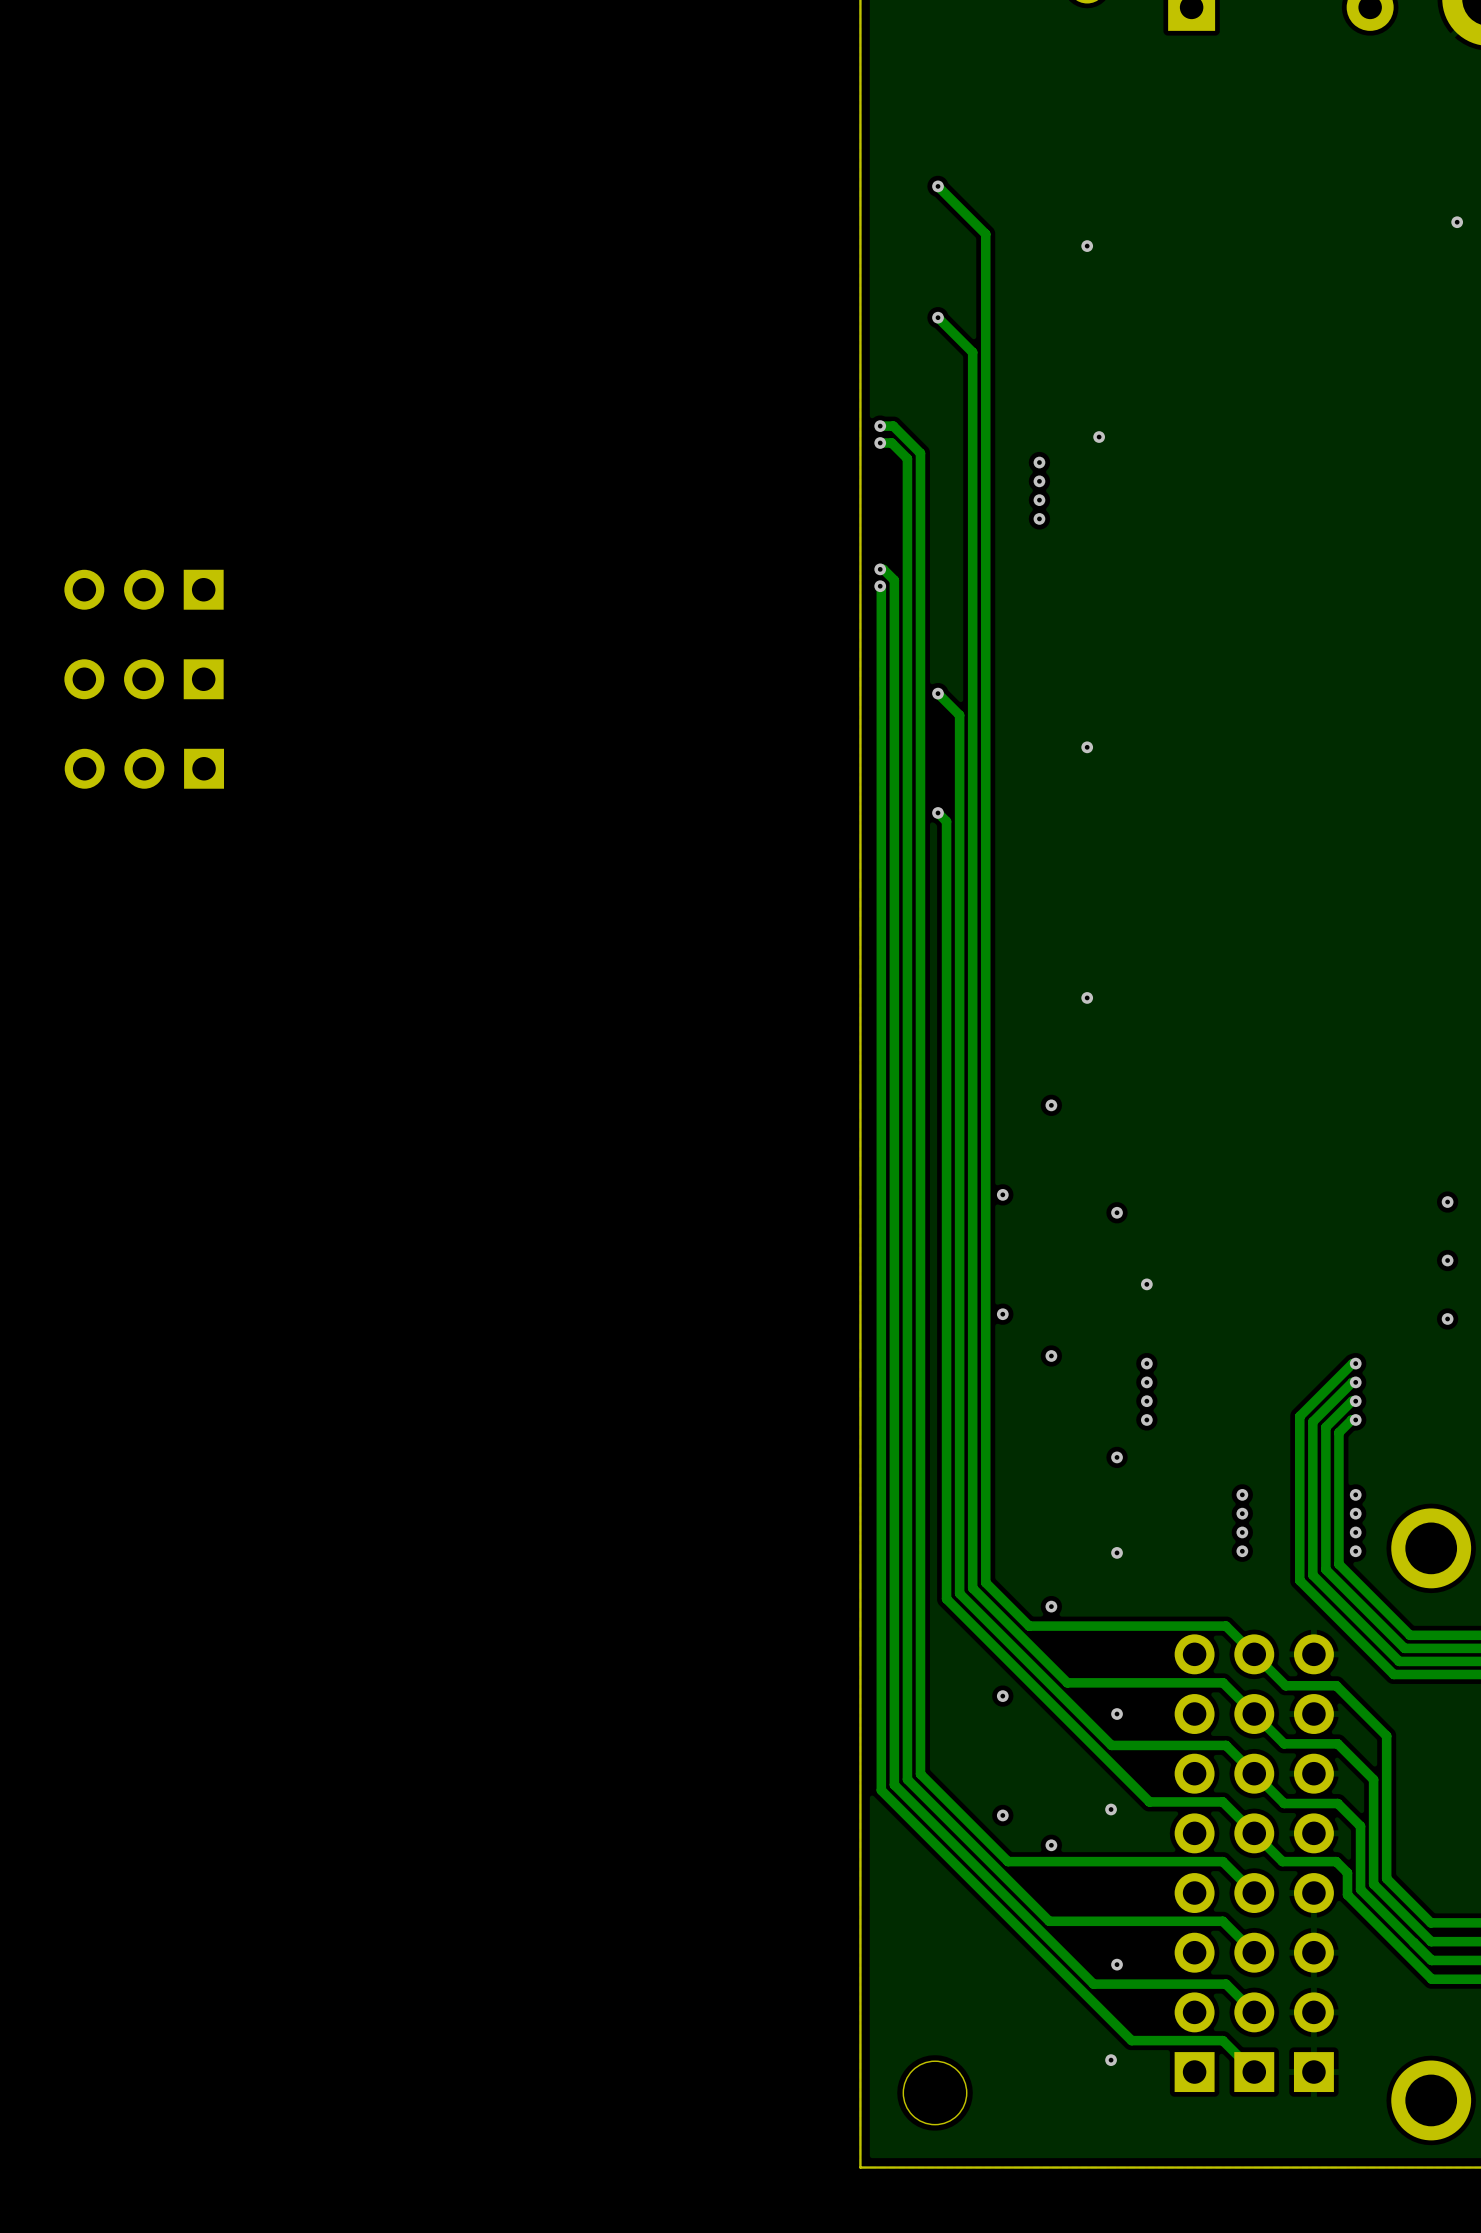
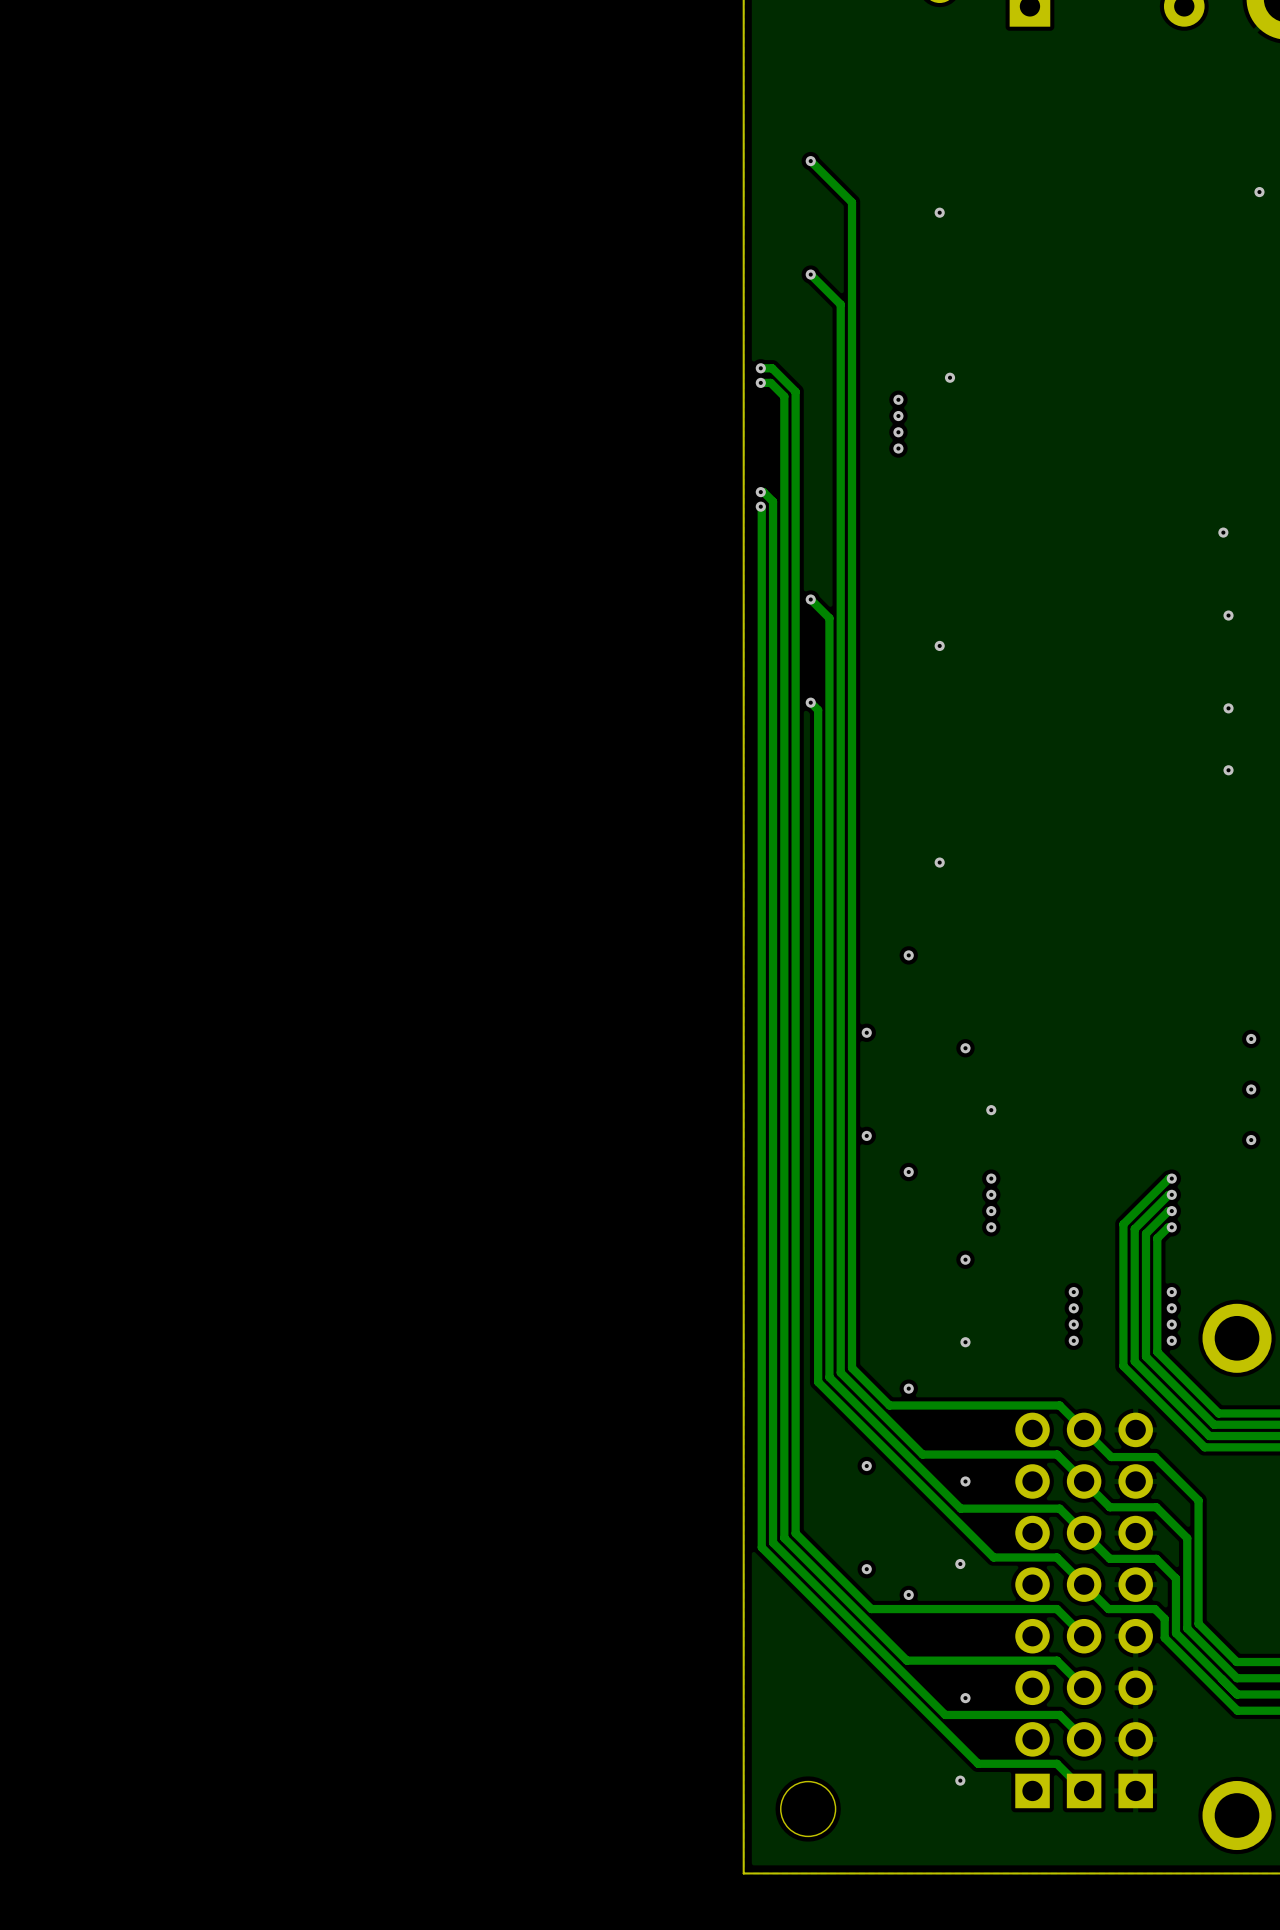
part: (144, 589) -> none
via: none -> (1223, 532)
part: (144, 679) -> none
via: none -> (1228, 615)
part: (144, 768) -> none
via: none -> (1228, 708)
via: none -> (1228, 770)

